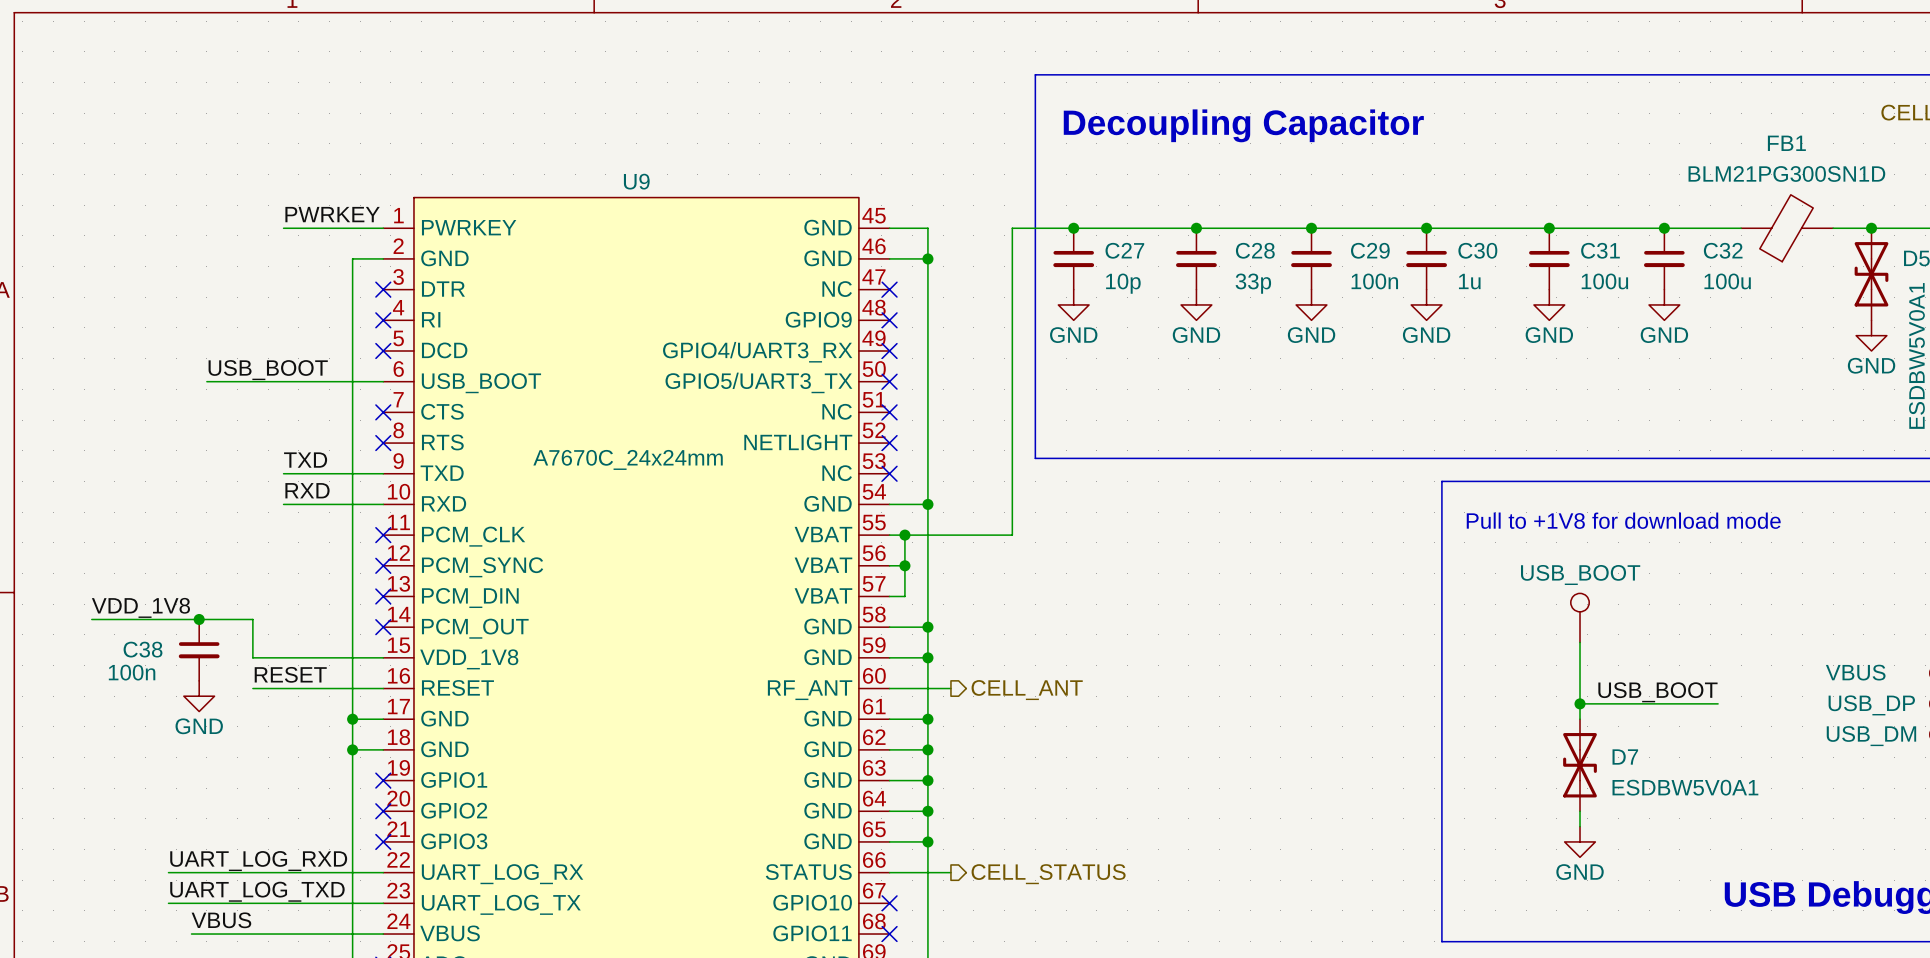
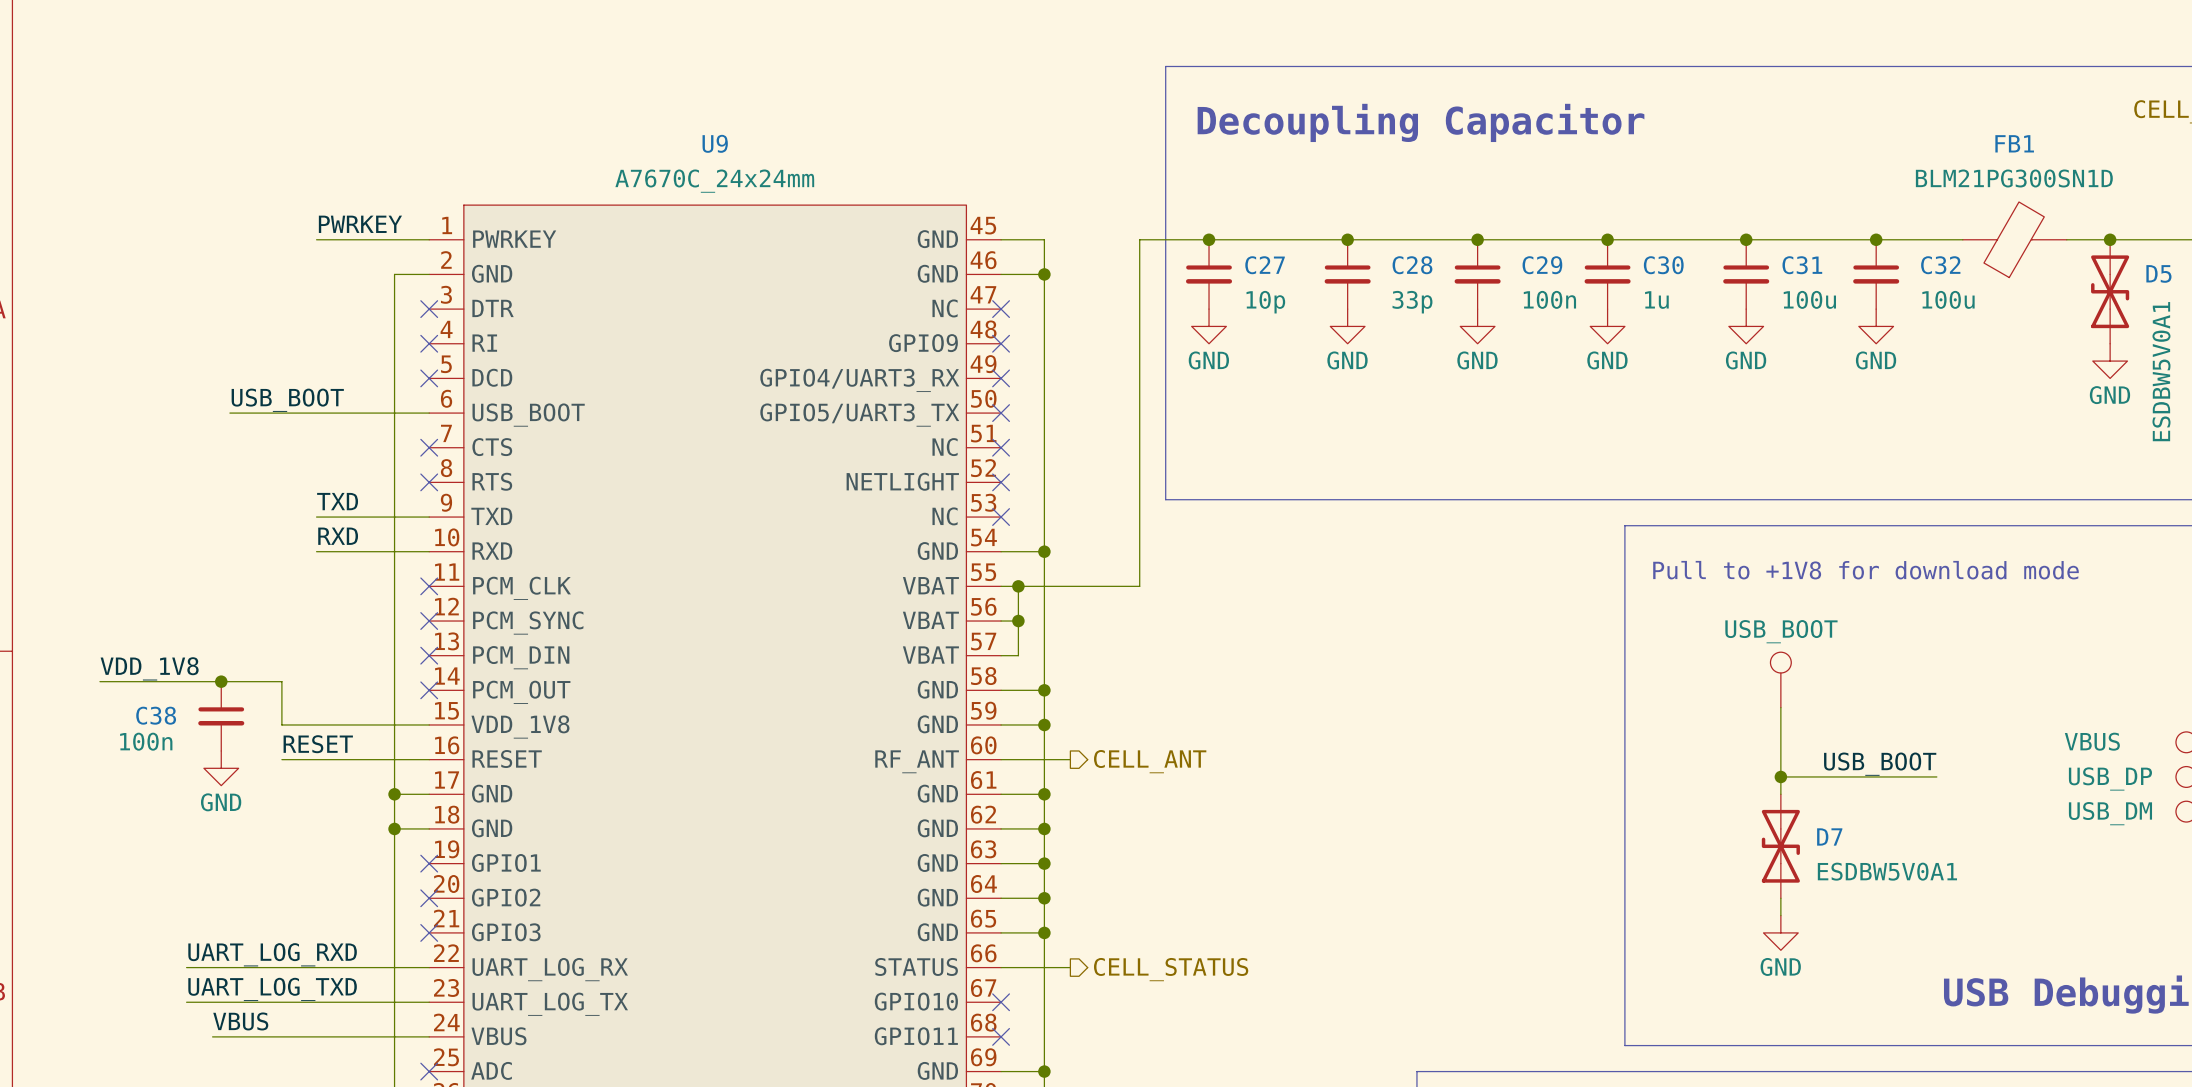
U9 name position: U9 (636, 181) -> U9 (715, 143)
U9 value position: A7670C_24x24mm (628, 459) -> A7670C_24x24mm (714, 181)

